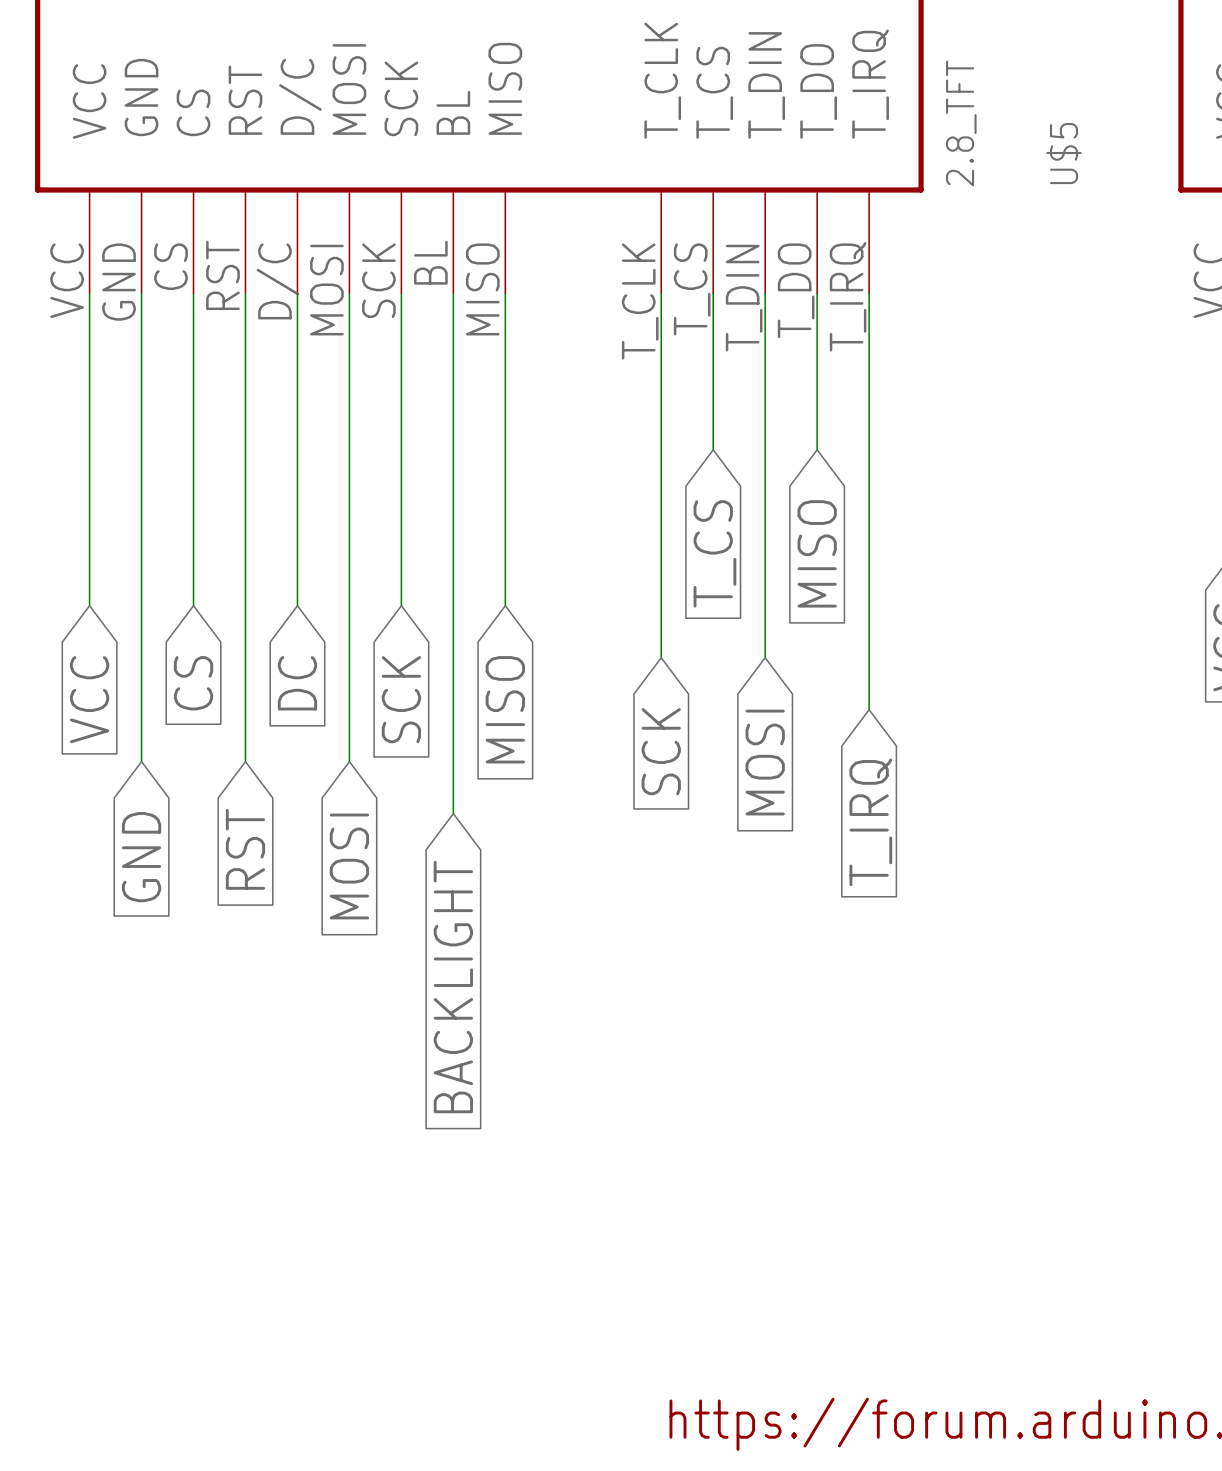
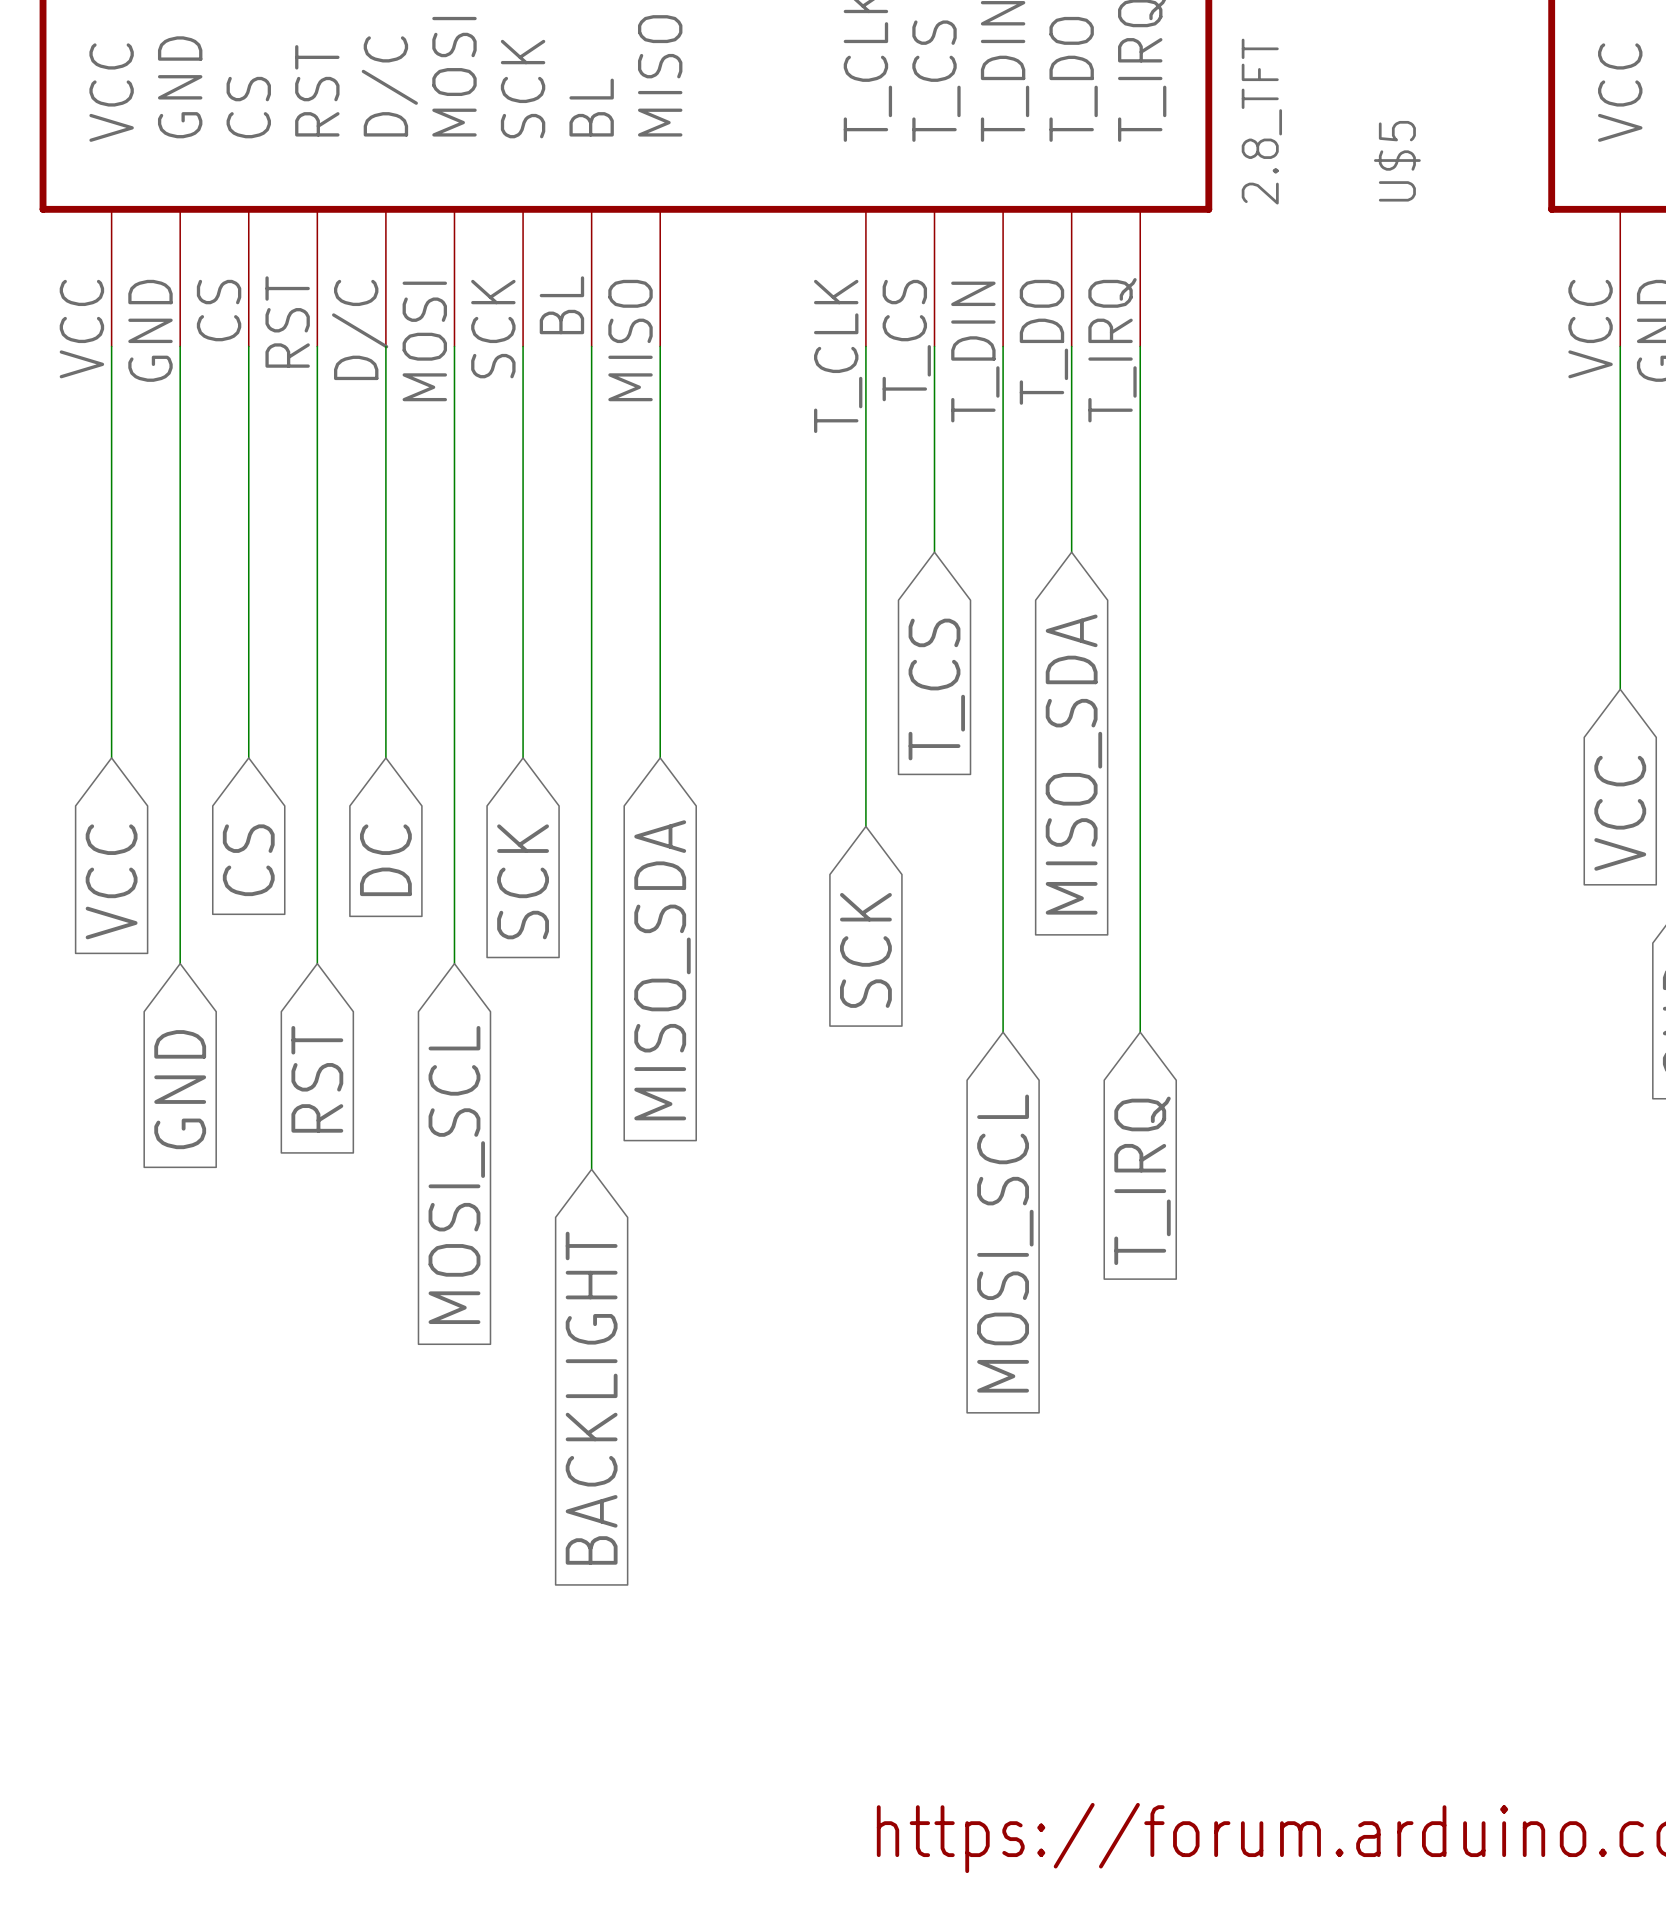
global label: MISO (817, 553) -> MISO_SDA (1073, 764)
wire: none -> (1003, 826) (1003, 1032)
global label: MISO (505, 709) -> MISO_SDA (662, 970)
wire: none -> (1140, 895) (1140, 1032)
global label: MOSI (765, 762) -> MOSI_SCL (1005, 1243)
wire: none -> (591, 1032) (591, 1169)
global label position: T_IRQ (870, 822) -> T_IRQ (1142, 1180)
global label: MOSI (349, 866) -> MOSI_SCL (456, 1175)
global label position: BACKLIGHT (453, 987) -> BACKLIGHT (591, 1398)

